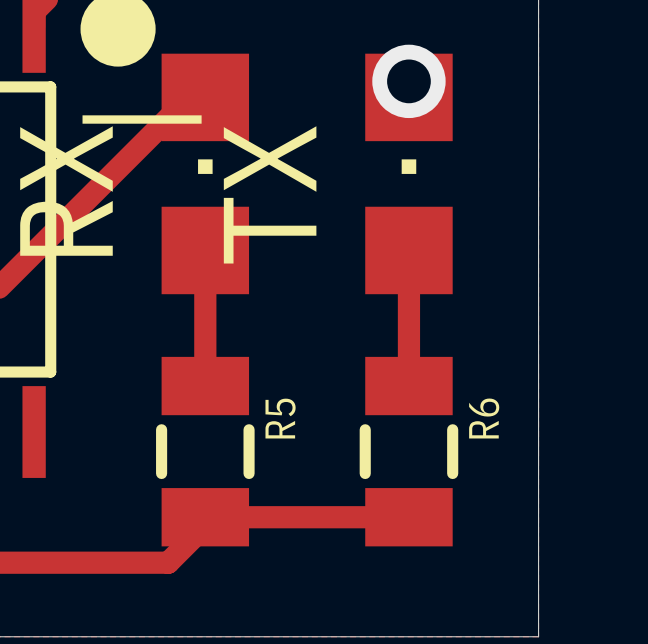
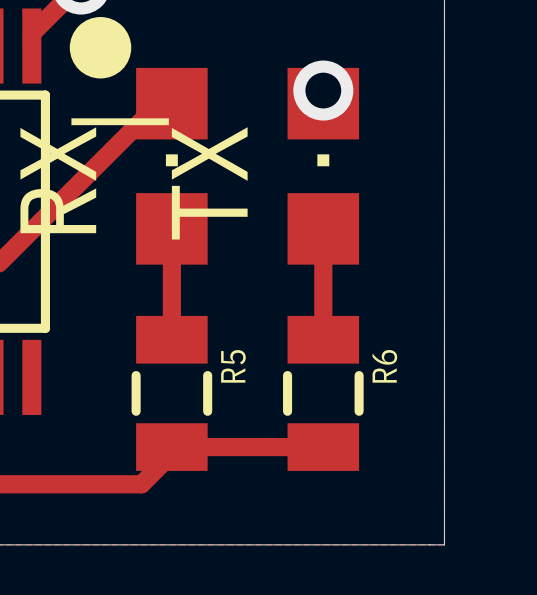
via position: (408, 81) -> (323, 90)
TX position: (408, 173) -> (323, 166)
track: (408, 250) (408, 386) -> (323, 228) (323, 339)
R6 position: (408, 451) -> (323, 393)

